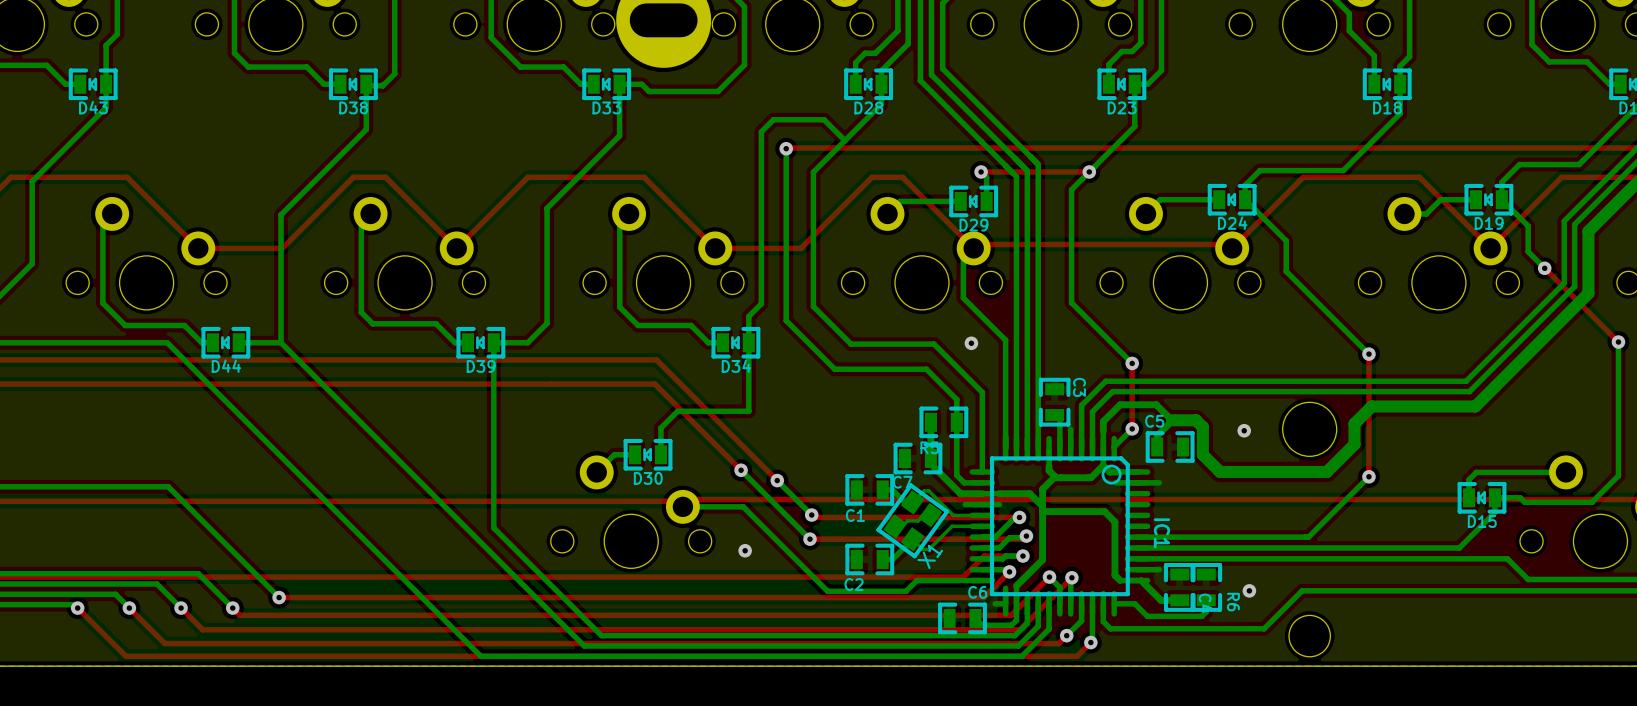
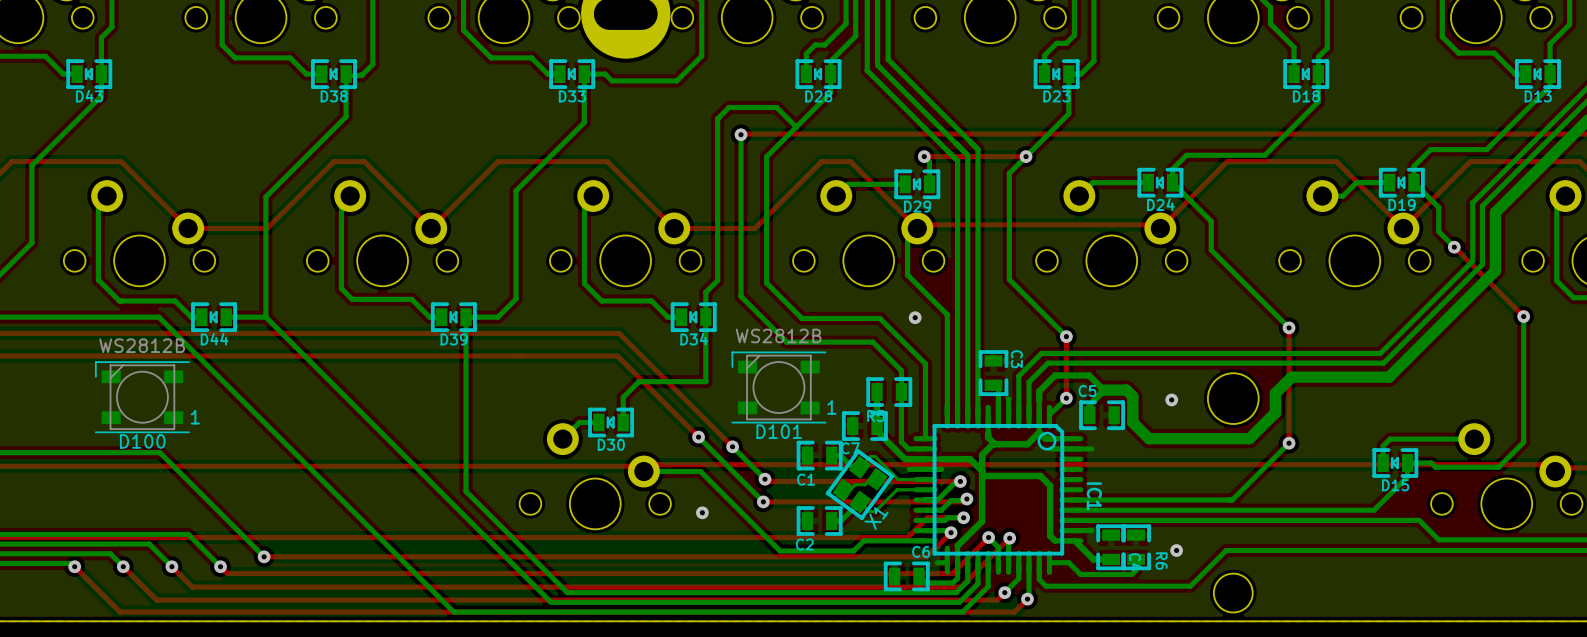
D101: none -> WS2812B (778, 387)
D100: none -> WS2812B (142, 397)

